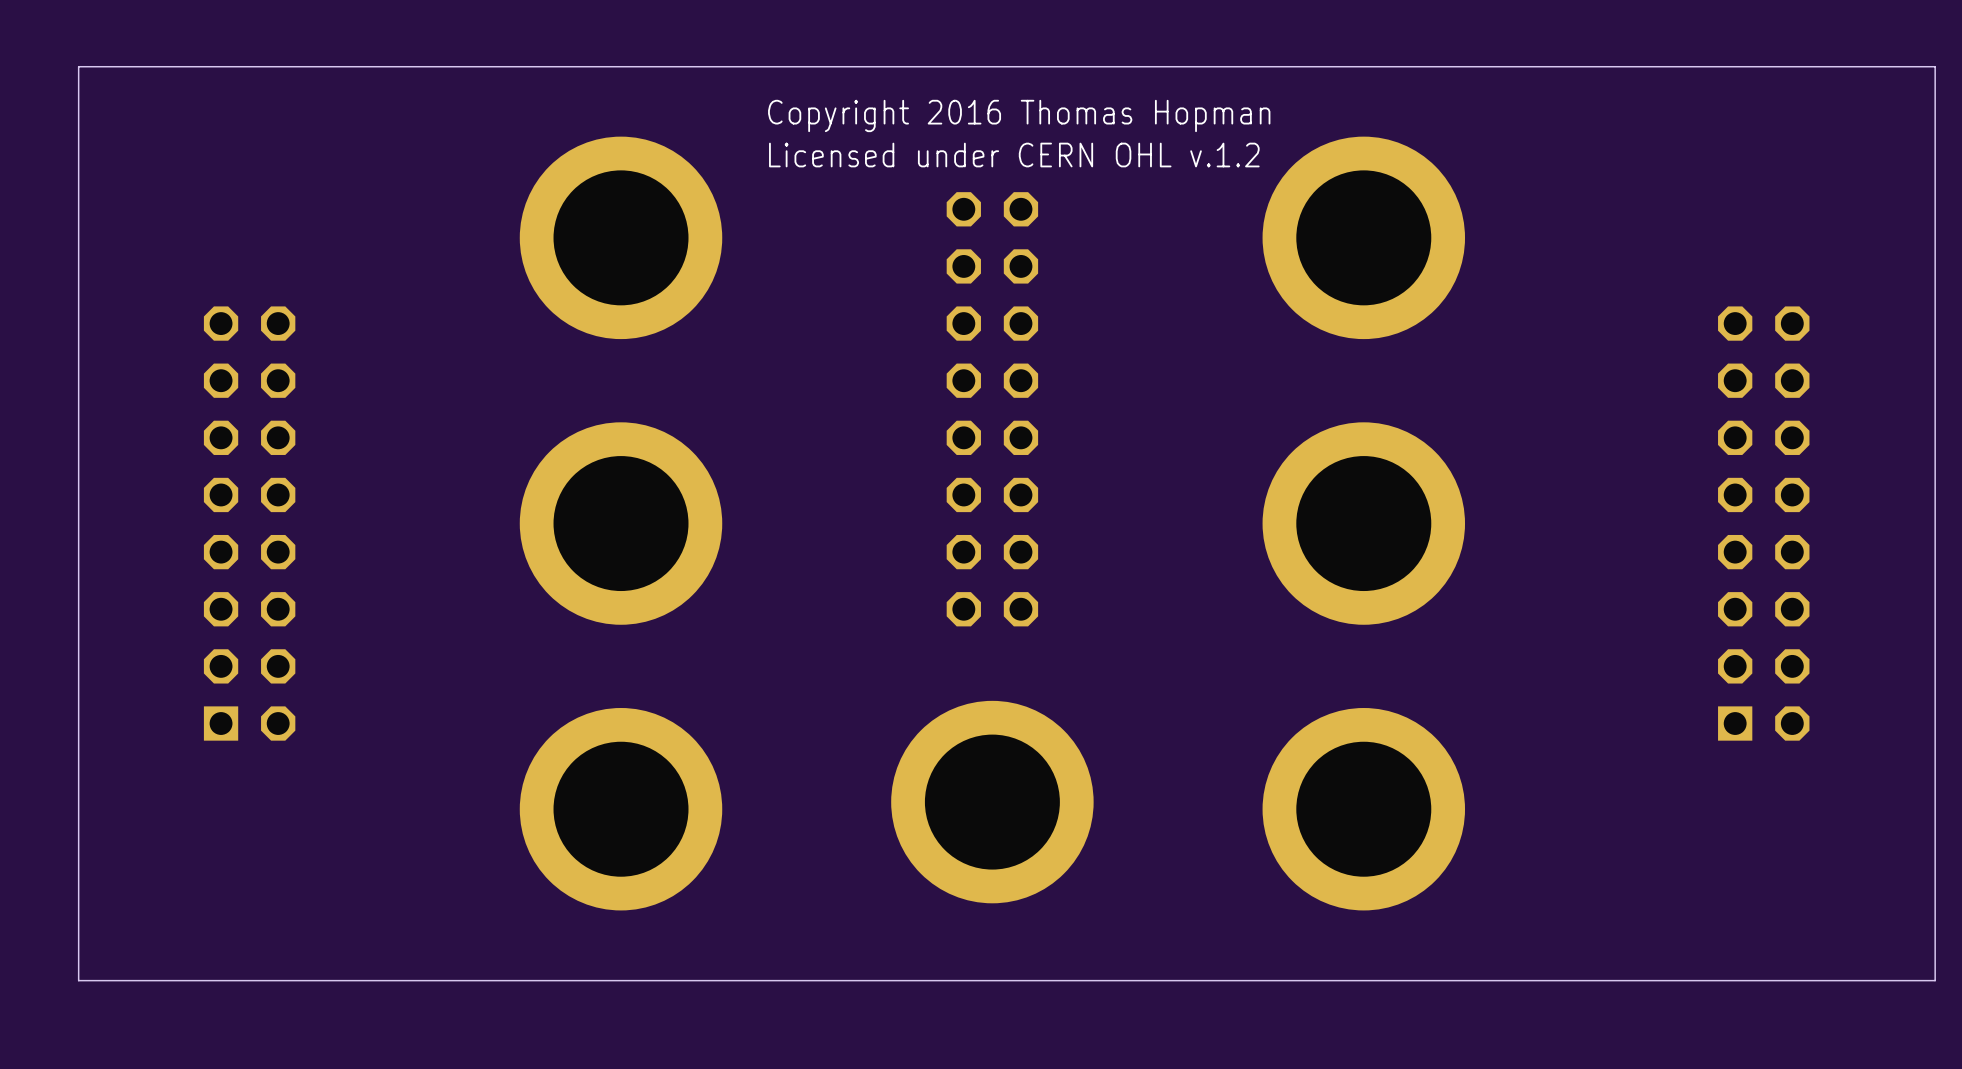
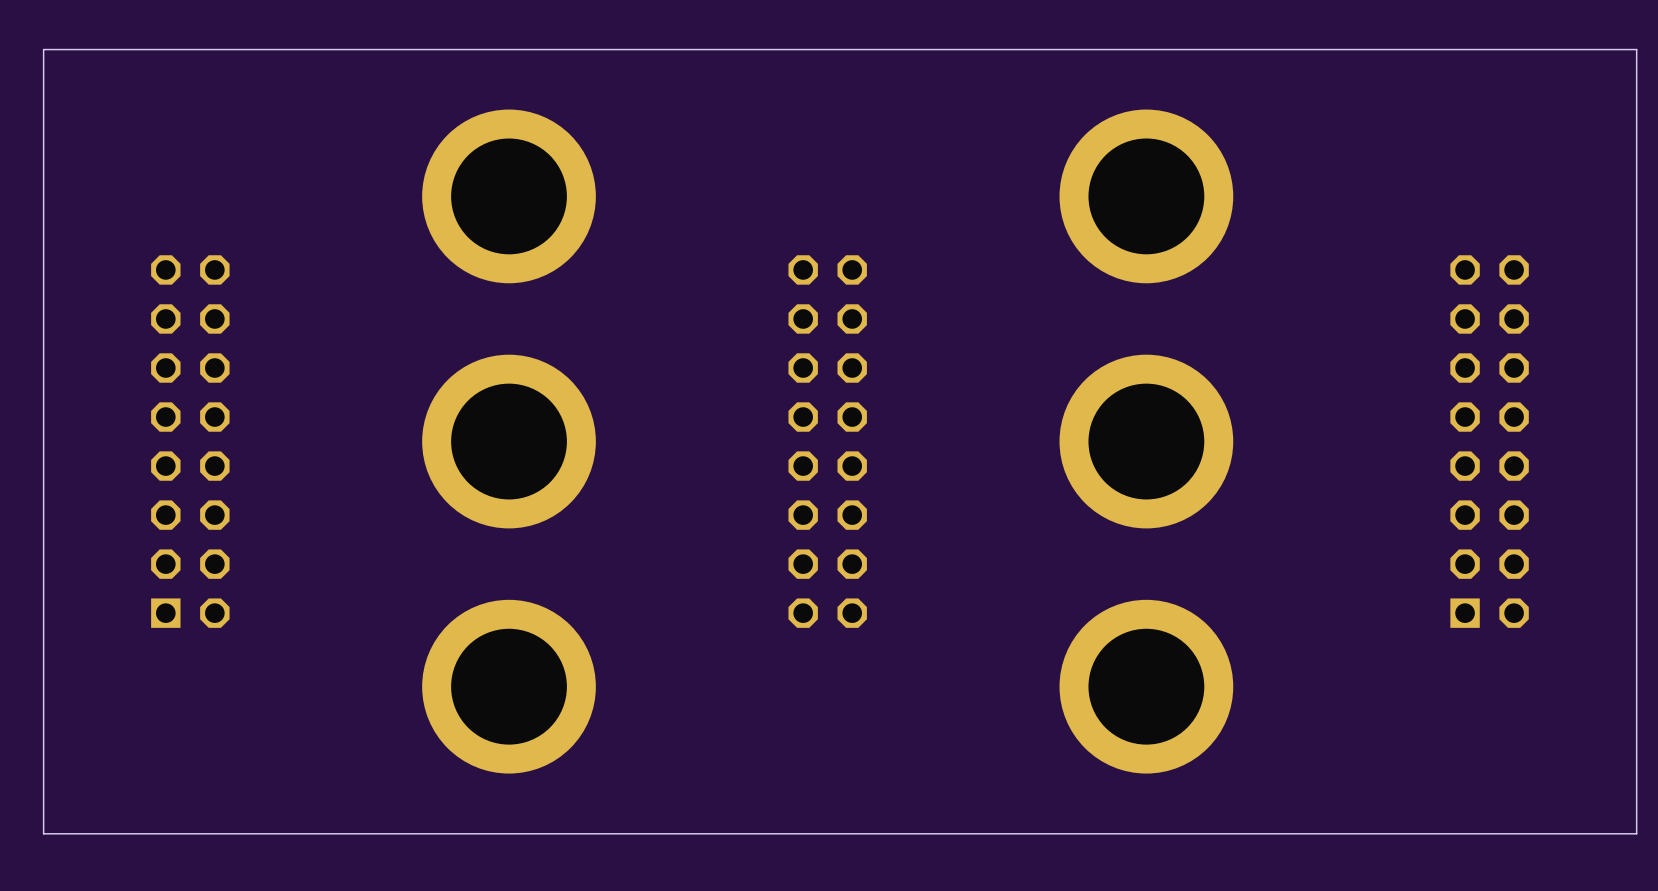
text: Copyright 2016 Thomas Hopman (1019, 115) -> none
text: Licensed under CERN OHL v.1.2 (1014, 155) -> none
part position: (992, 409) -> (827, 441)
part: (992, 802) -> none

